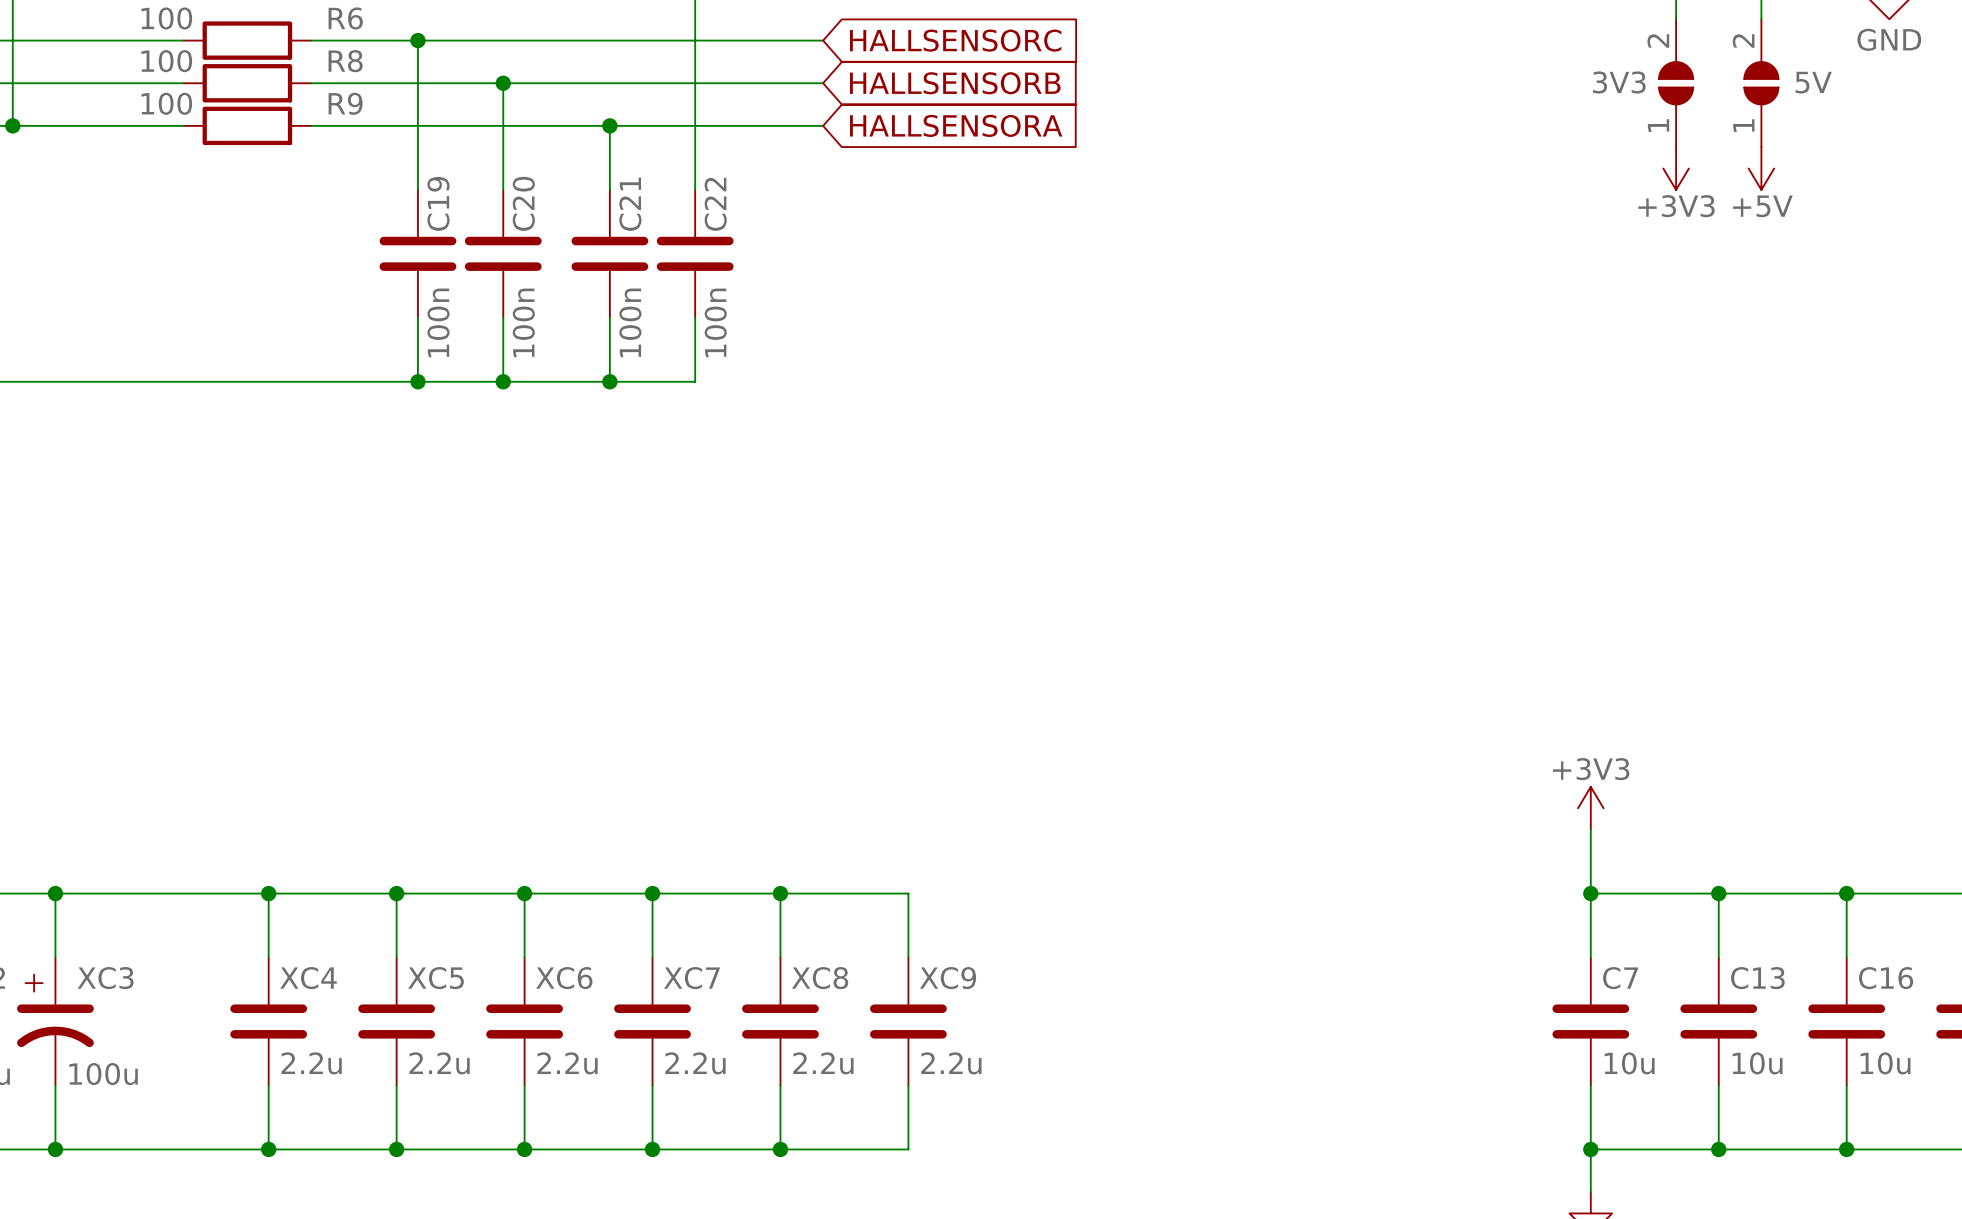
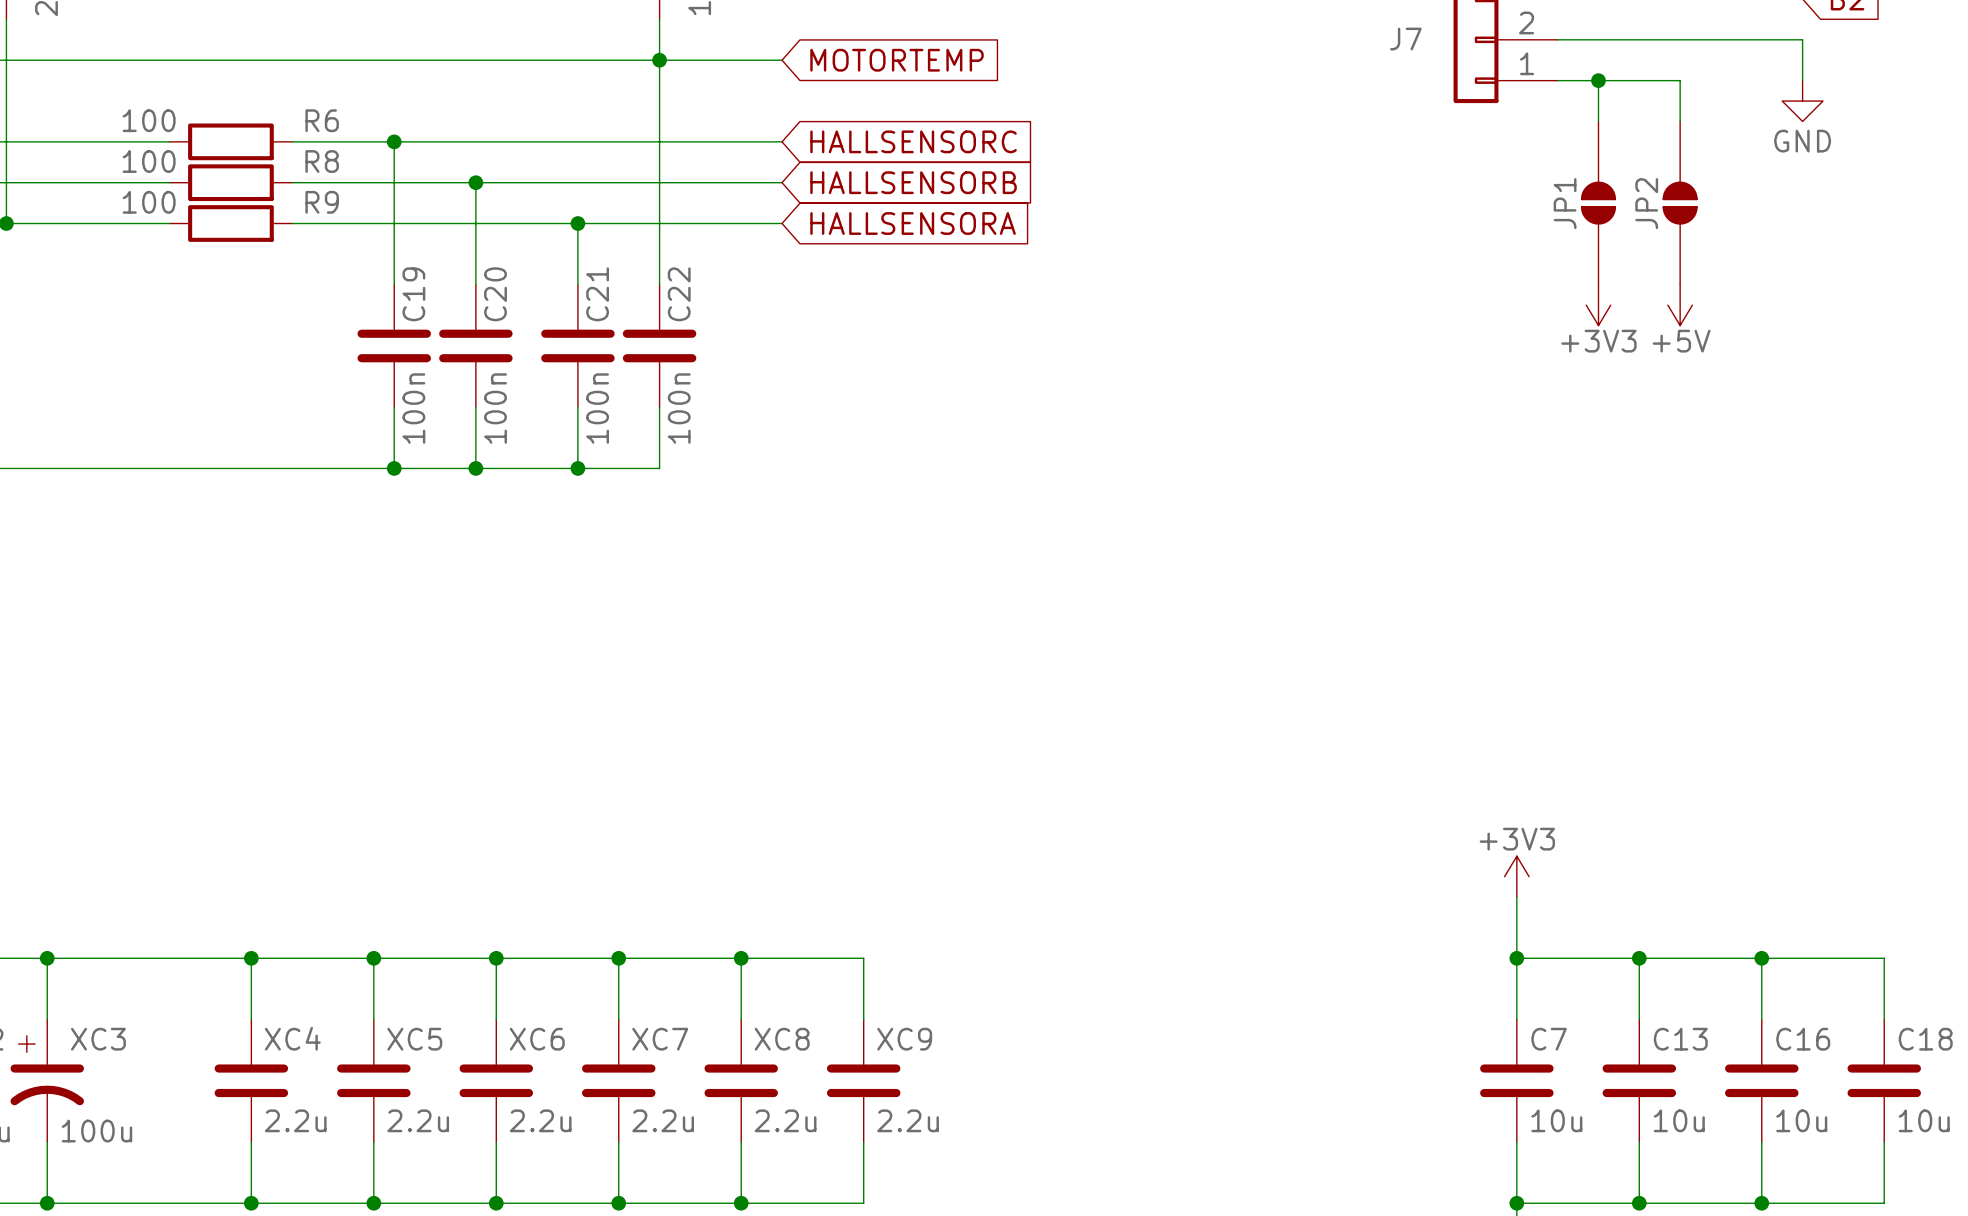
part: (1676, 83) -> none
part: (1761, 83) -> none
JP1: none -> (1598, 203)
JP2: none -> (1680, 203)
power symbol position: +3V3 (1676, 168) -> +3V3 (1598, 305)
power symbol position: +5V (1761, 168) -> +5V (1680, 305)

